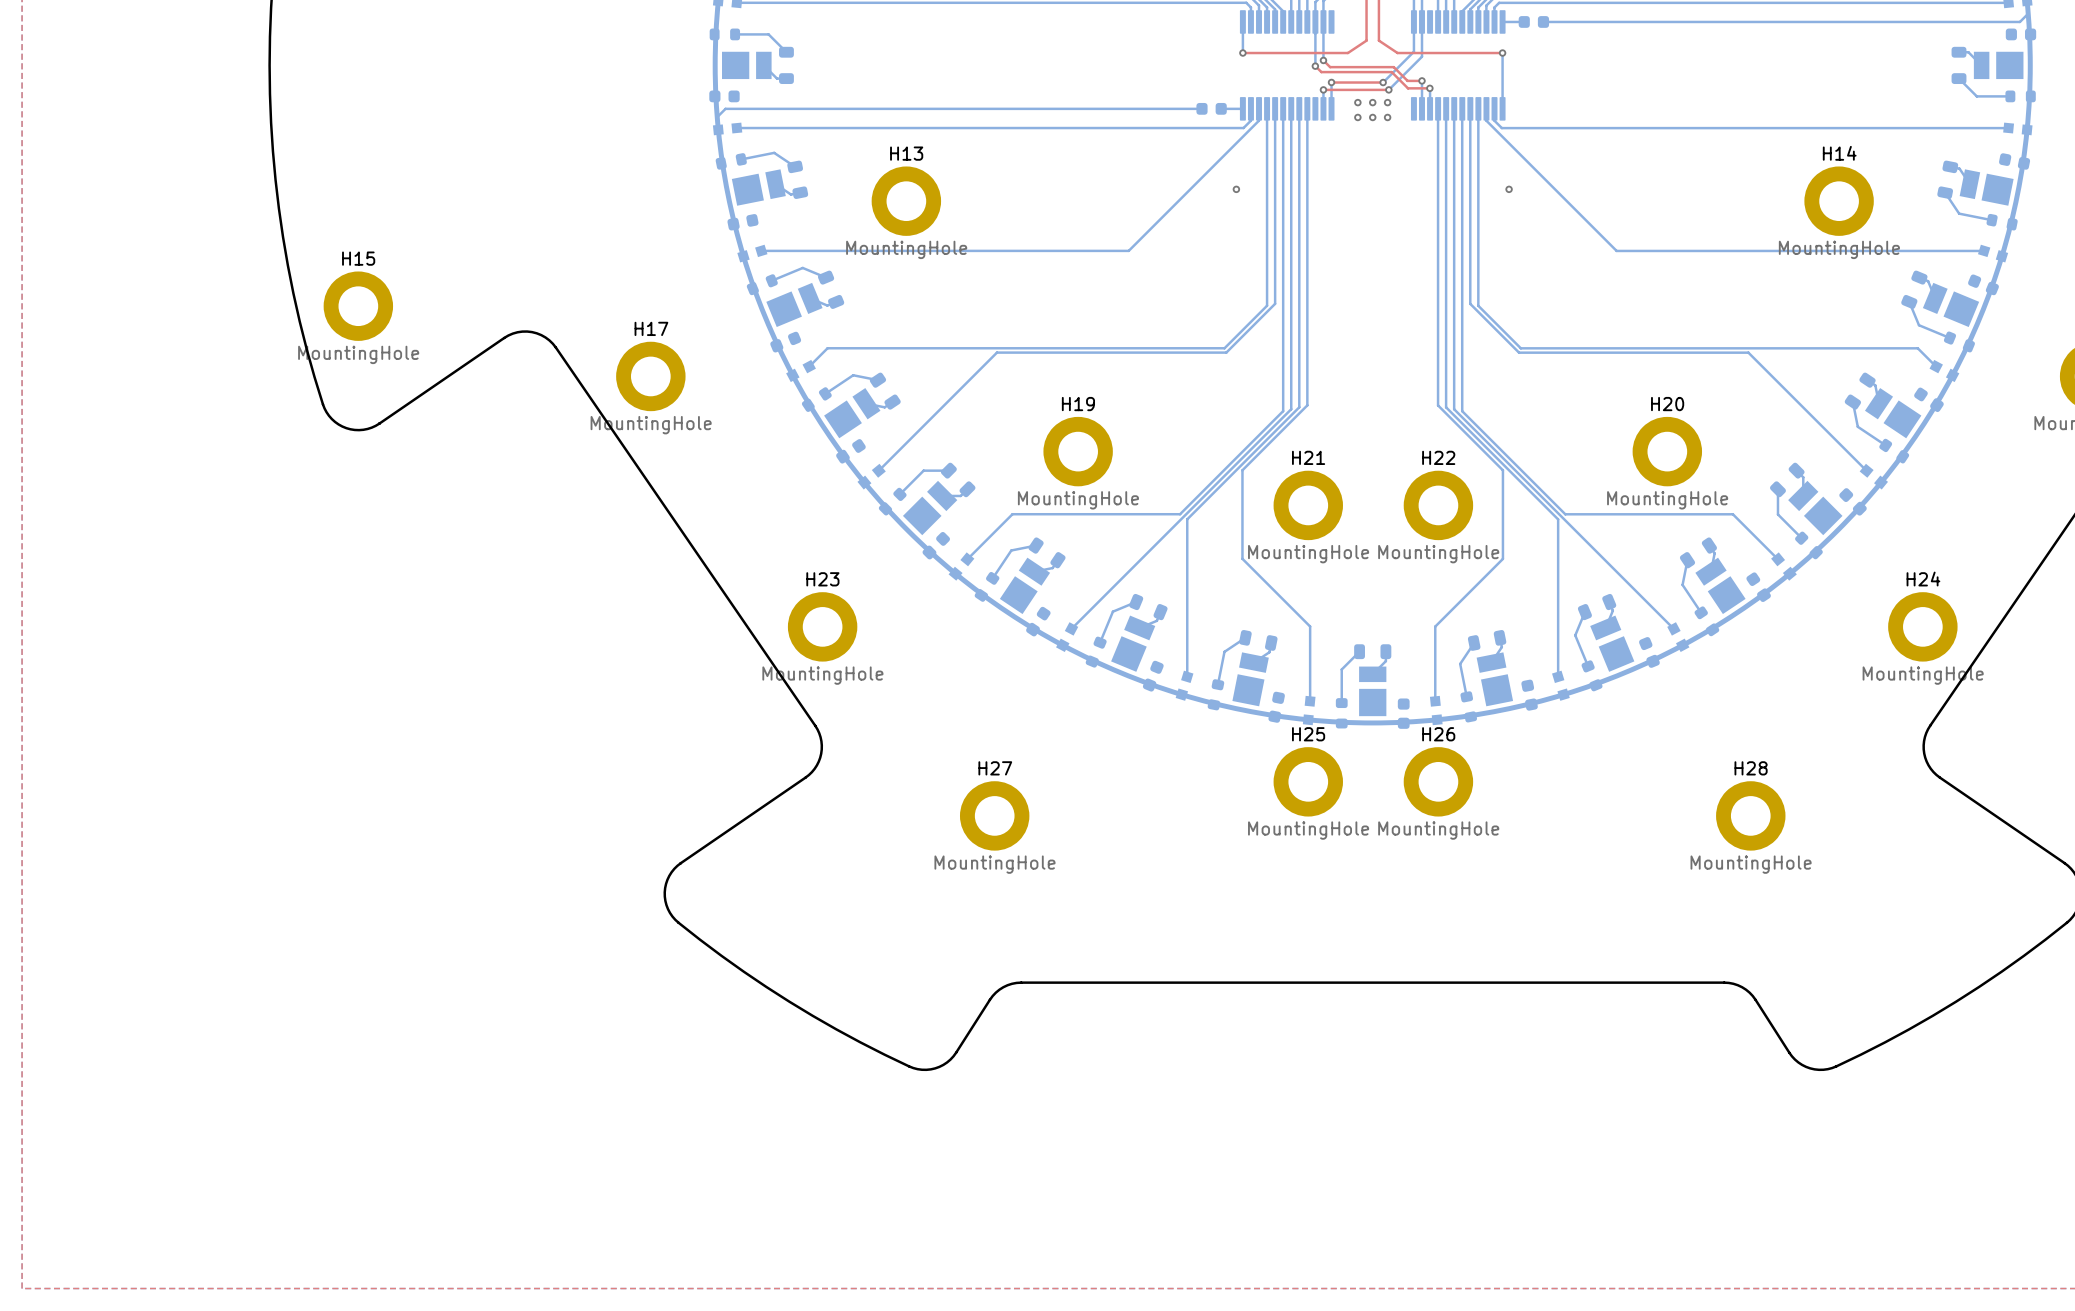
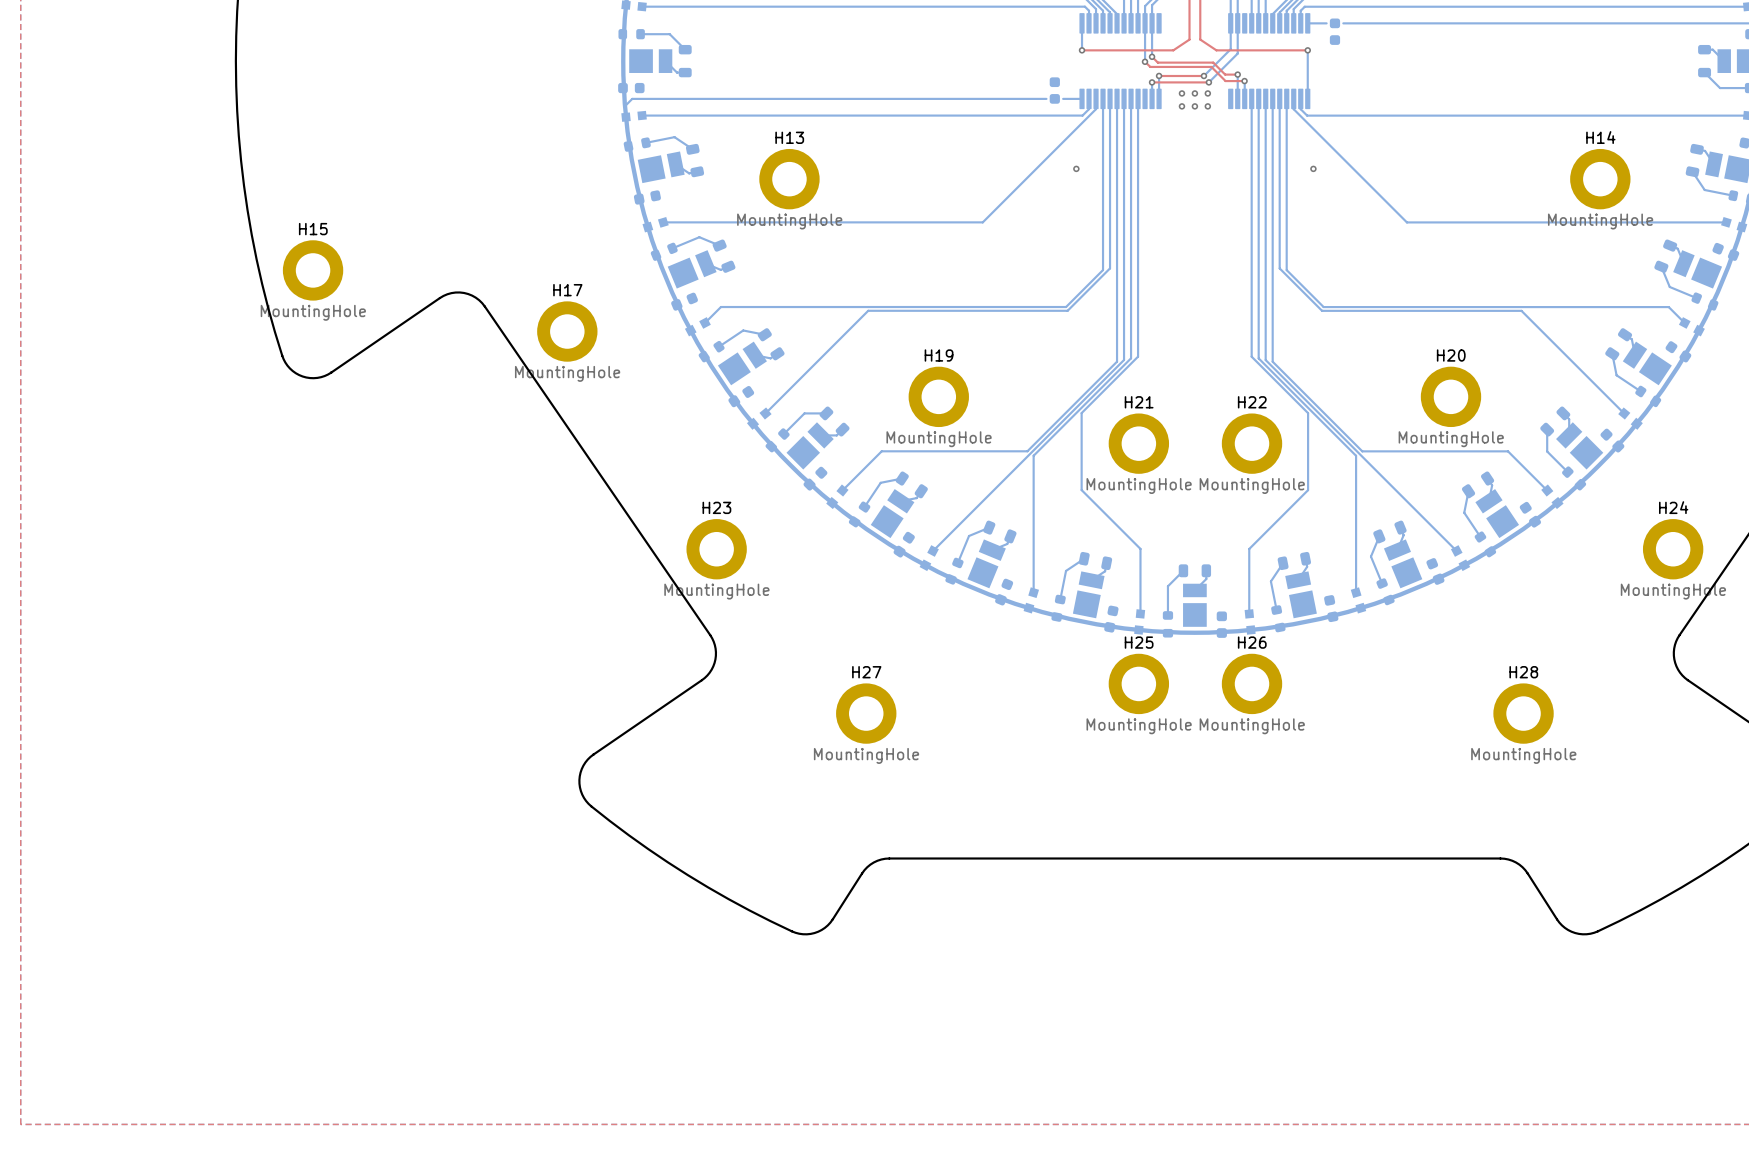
part rotation: 0° (1533, 21) -> 90° clockwise (1334, 31)
part rotation: 0° (1211, 108) -> 90° clockwise (1054, 90)

